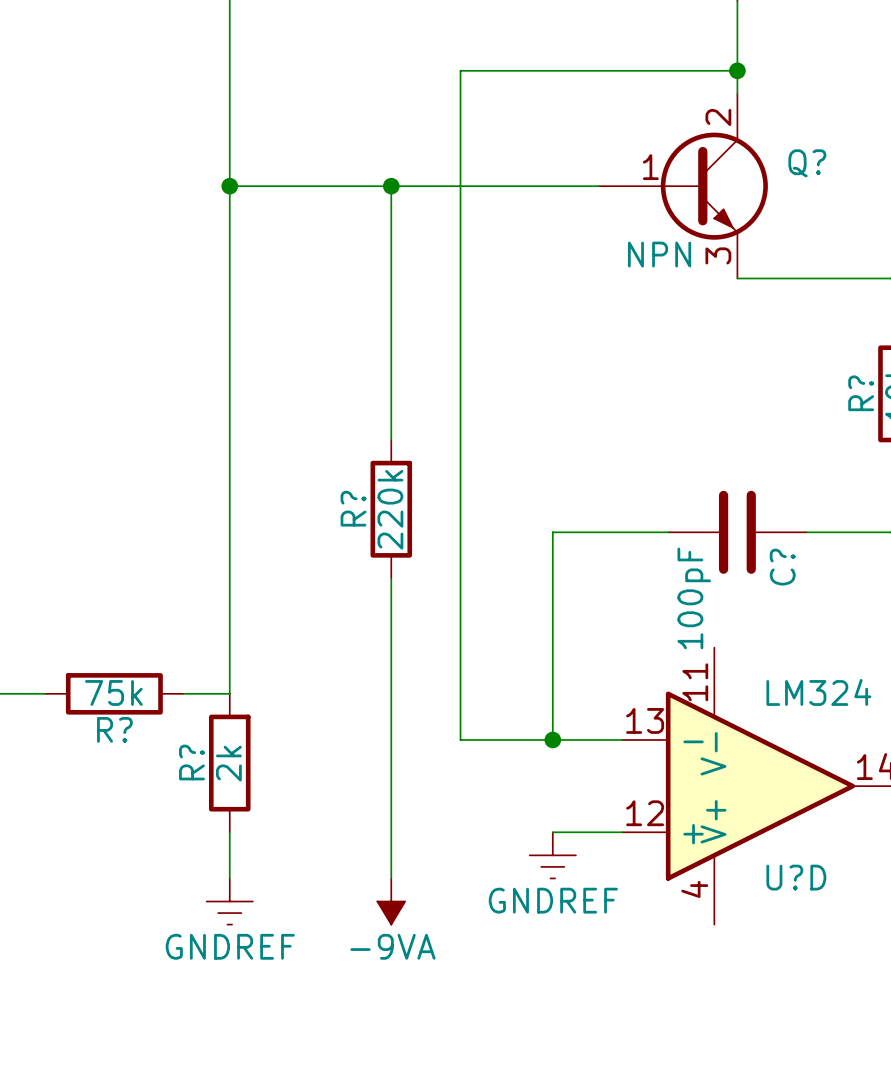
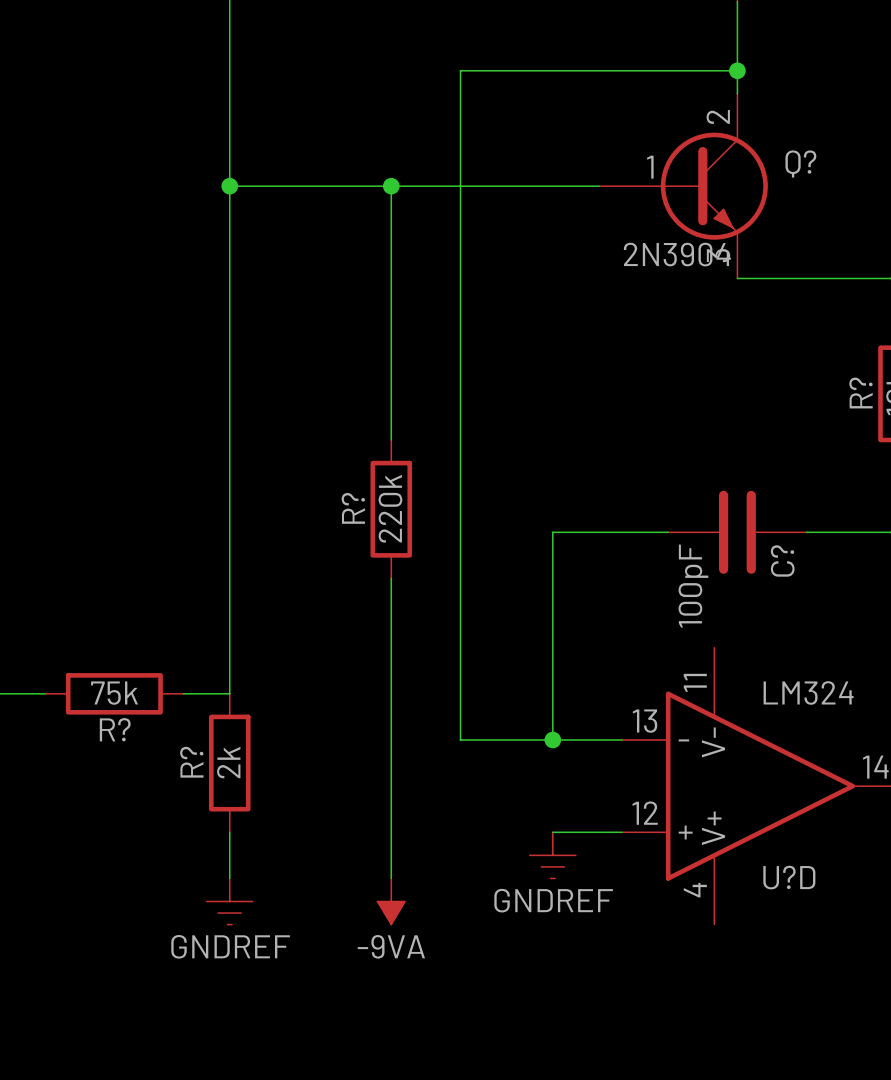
Q? value: NPN (659, 254) -> 2N3904 (677, 254)

